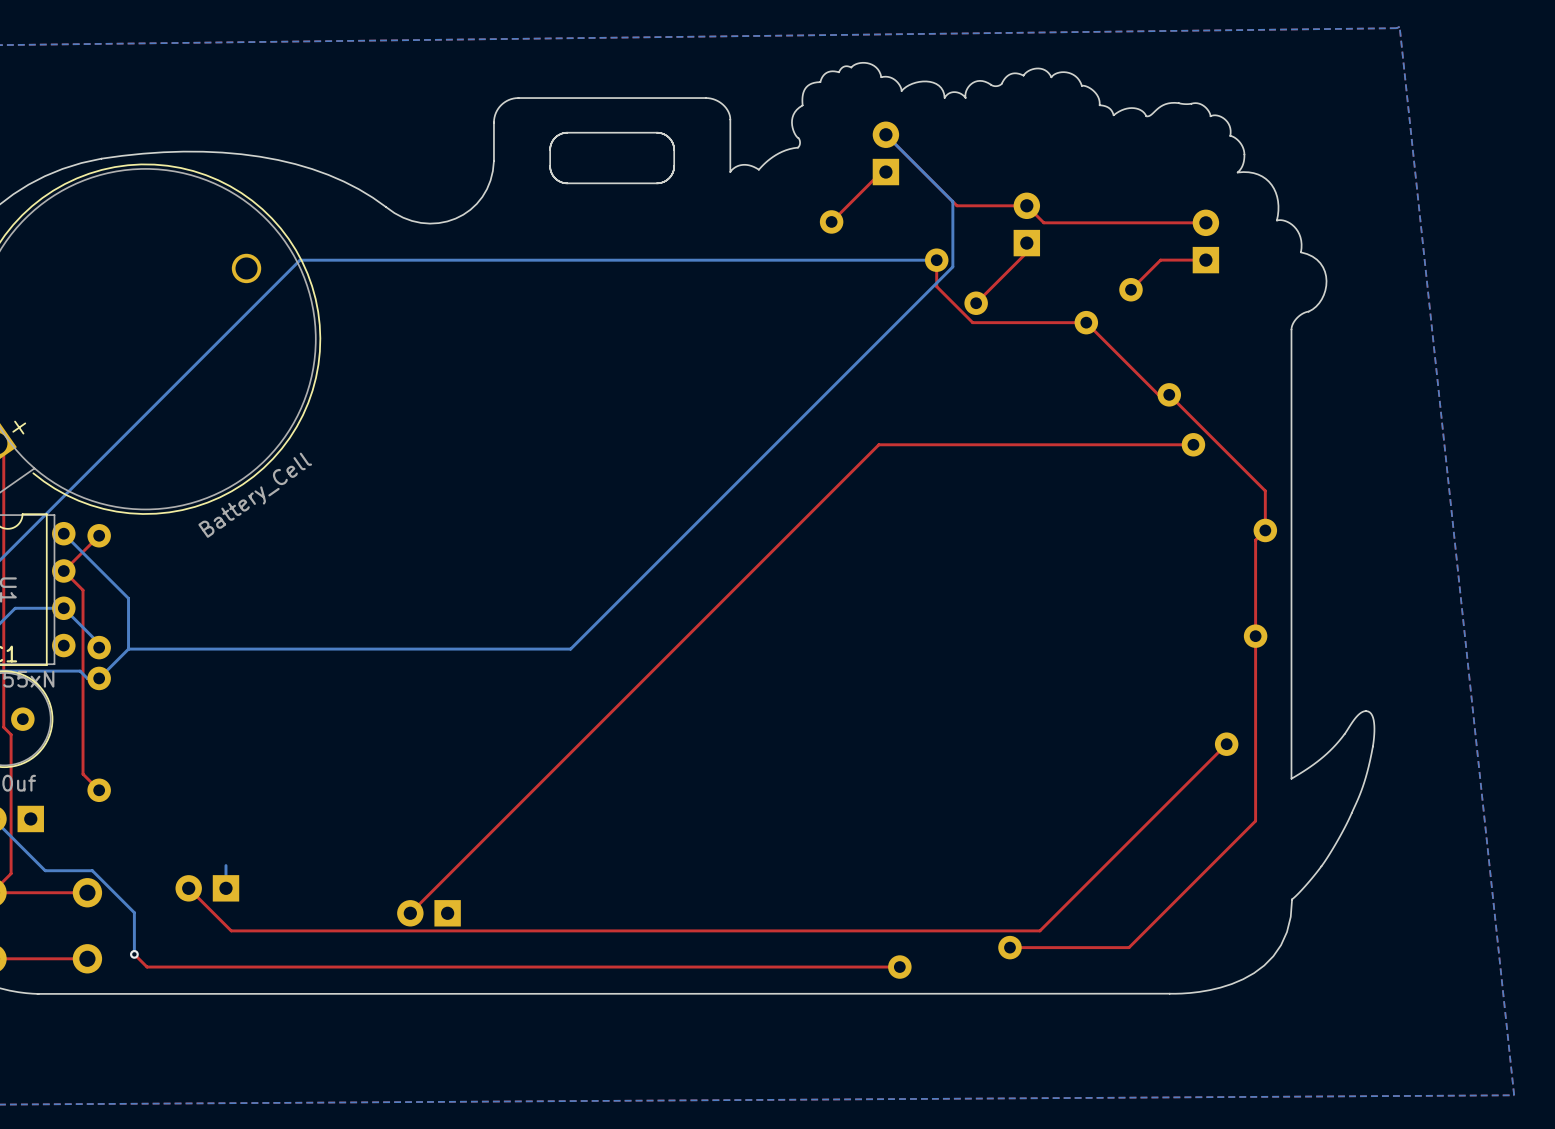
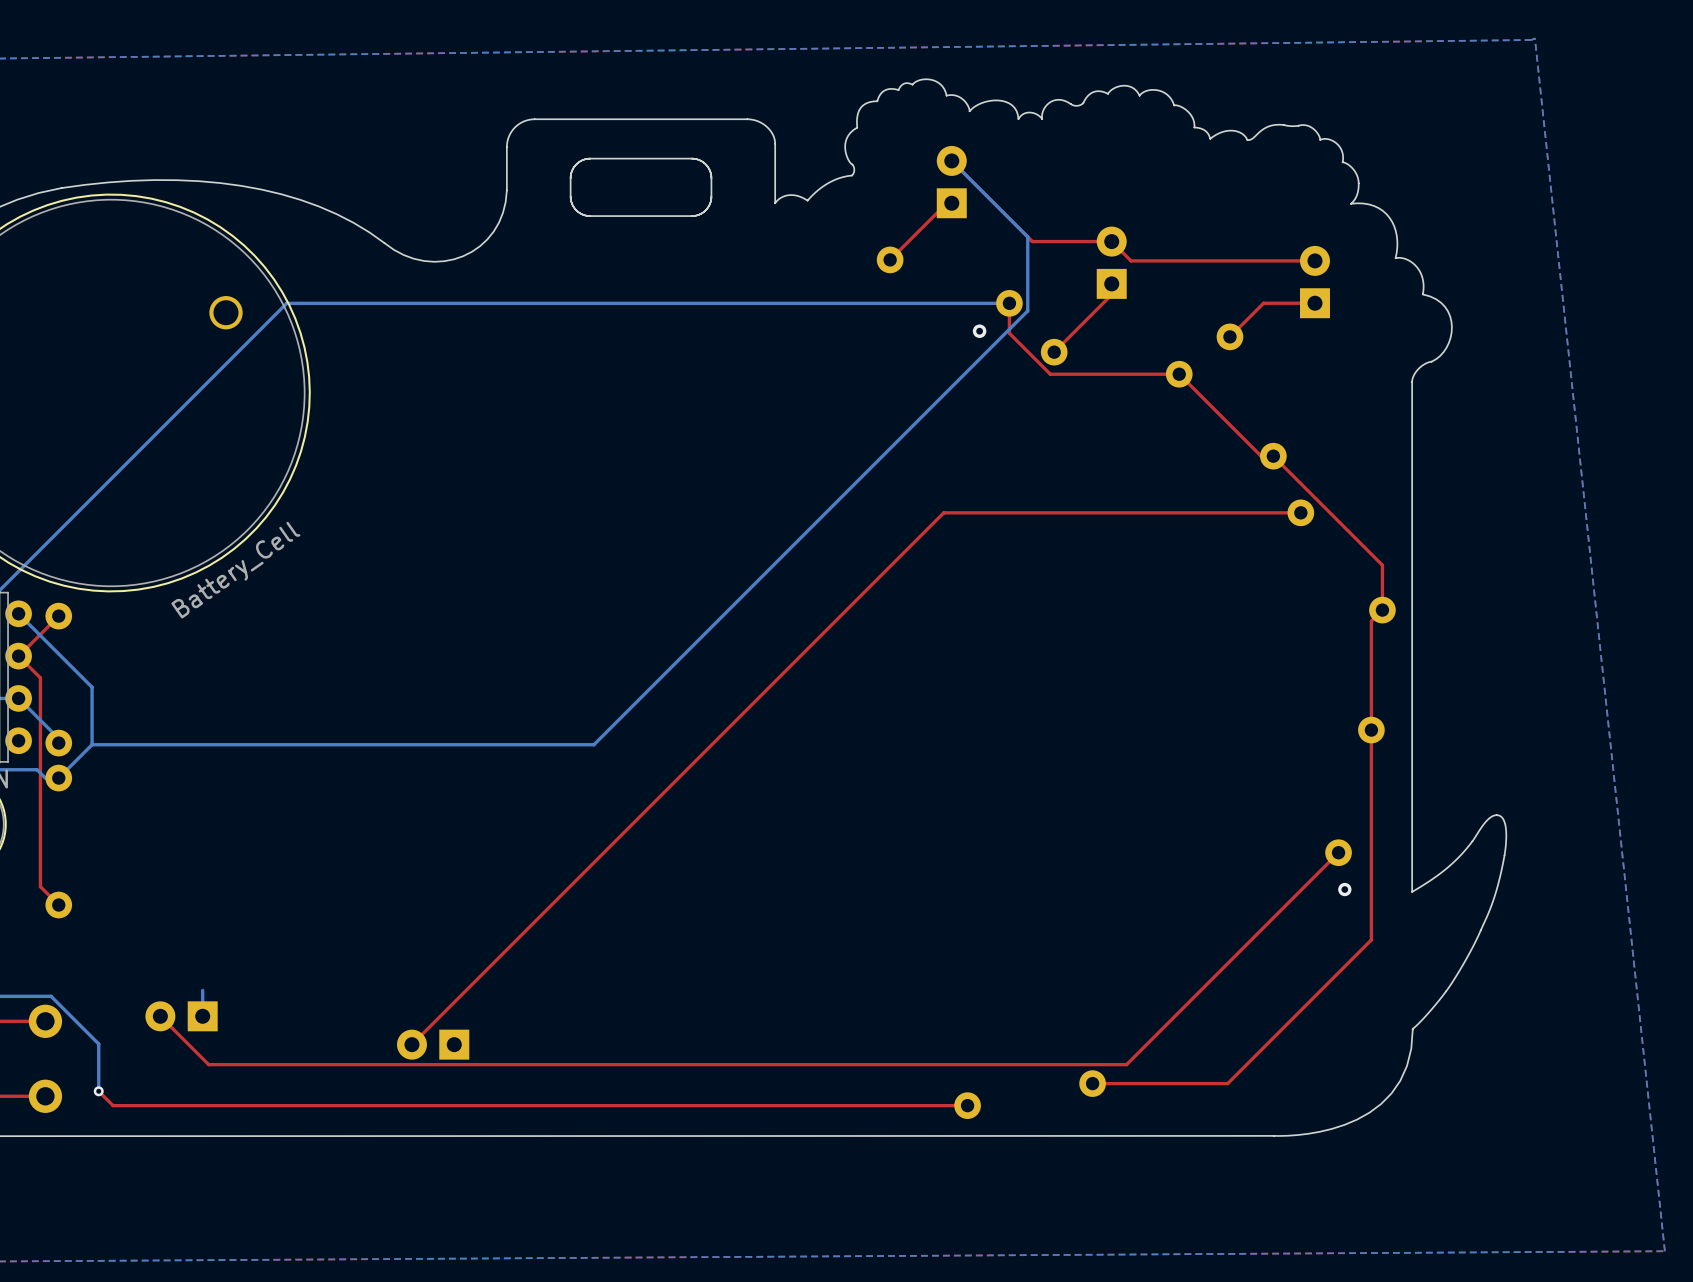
via: none -> (979, 331)
via: none -> (1344, 889)

